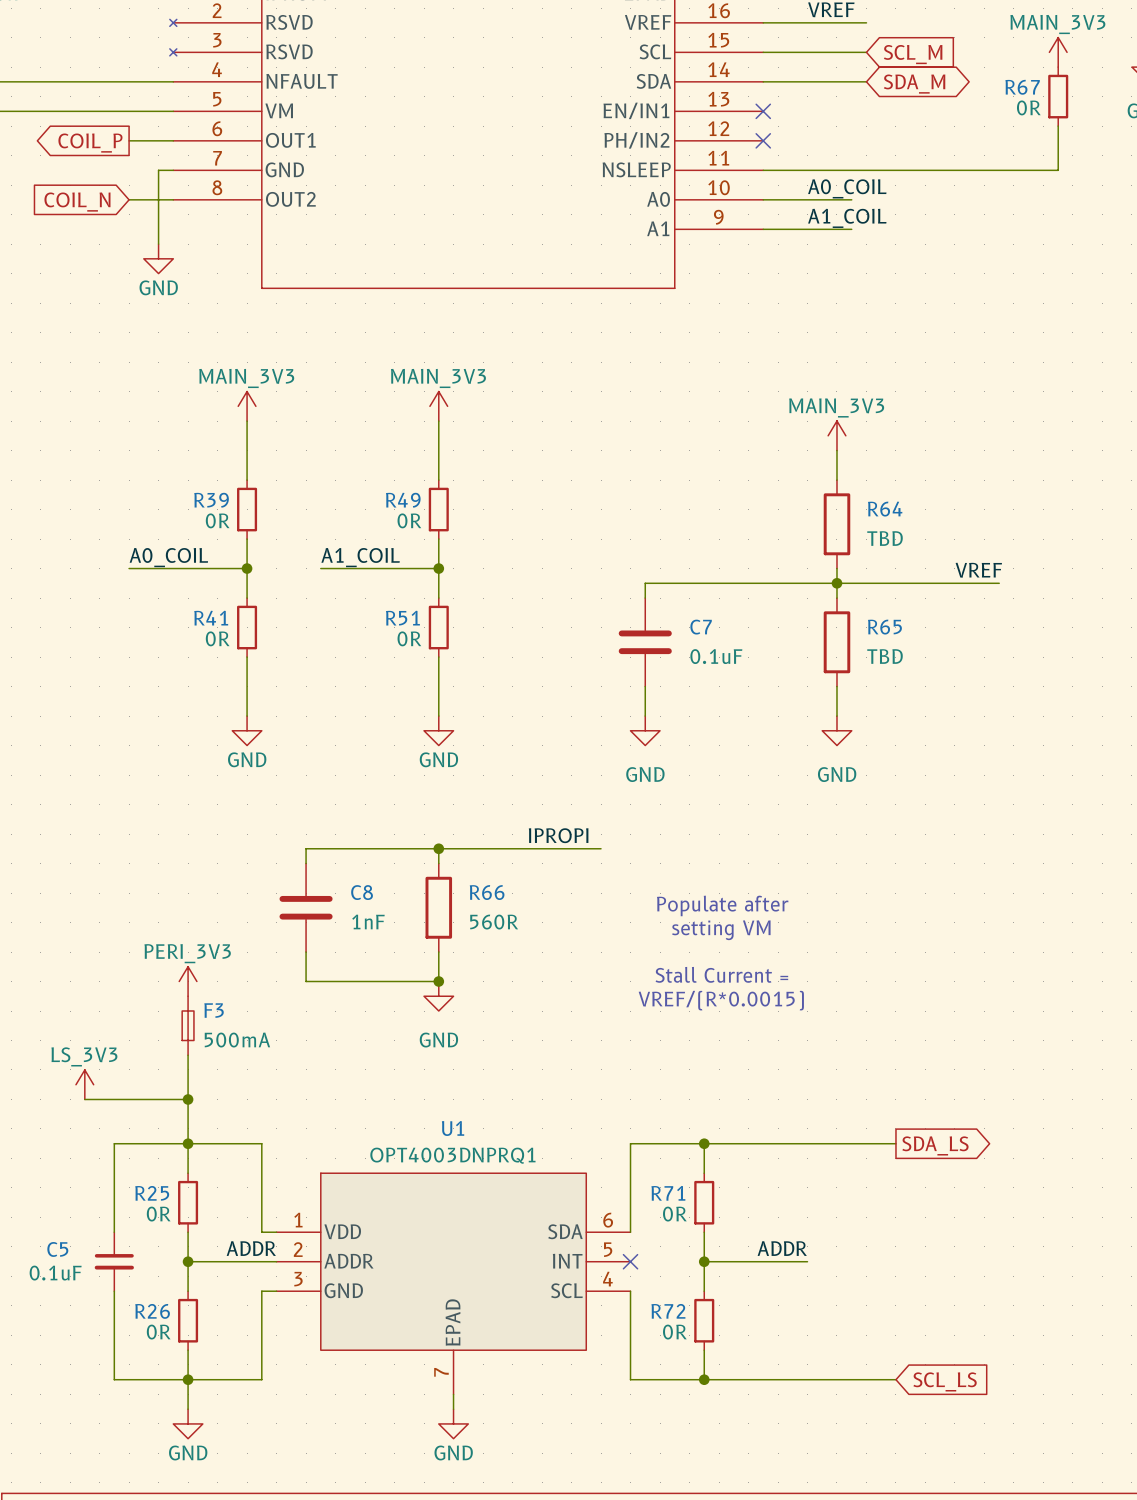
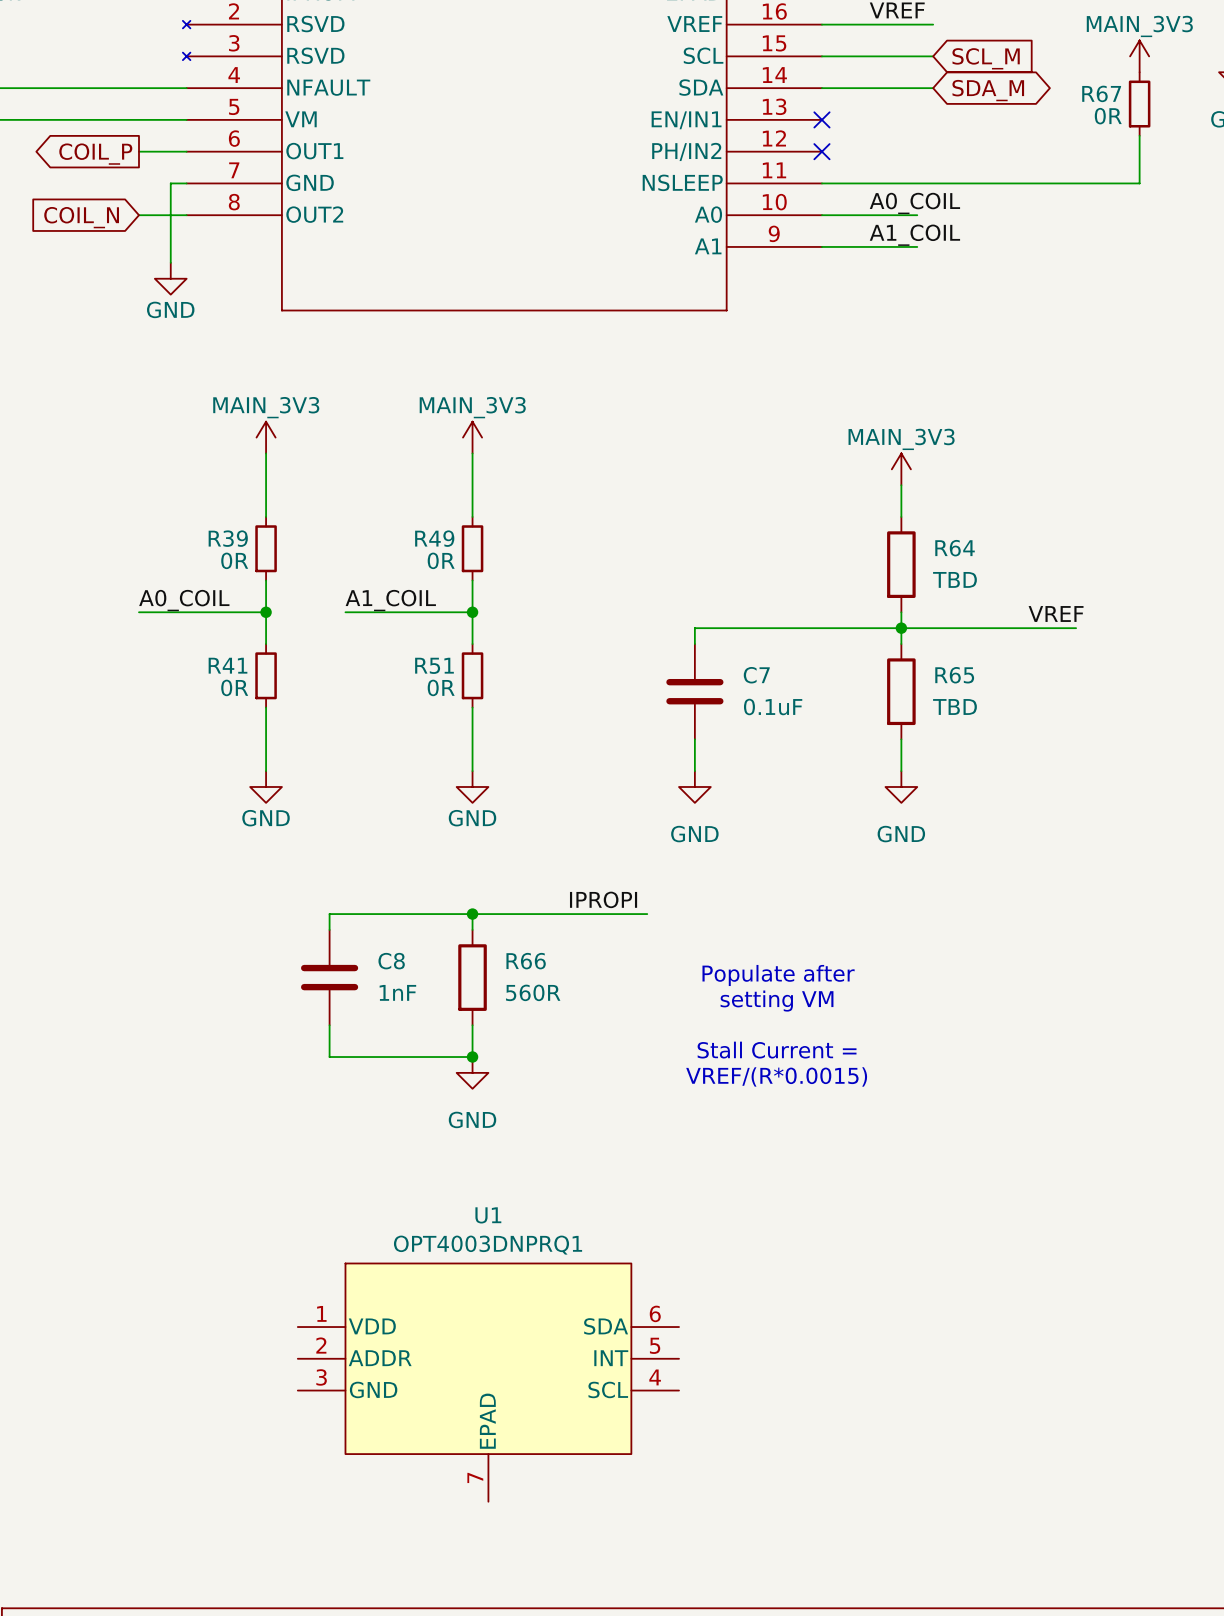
power symbol: PERI_3V3 (188, 981) -> none
F3: 500mA (188, 1025) -> none
wire: (188, 1055) (188, 1173) -> none
power symbol: LS_3V3 (84, 1084) -> none
wire: (84, 1099) (188, 1099) -> none
junction: (188, 1099) -> none
junction: (188, 1143) -> none
wire: (704, 1143) (704, 1173) -> none
junction: (704, 1143) -> none
wire: (895, 1143) (630, 1143) (630, 1232) -> none
global label: SDA_LS (935, 1145) -> none
R25: 0R (188, 1202) -> none
R71: 0R (704, 1202) -> none
wire: (114, 1232) (114, 1143) (261, 1143) (261, 1232) (276, 1232) -> none
wire: (188, 1232) (188, 1291) -> none
wire: (704, 1232) (704, 1291) -> none
label: ADDR (251, 1248) -> none
label: ADDR (782, 1248) -> none
C5: 0.1uF (114, 1261) -> none
wire: (188, 1261) (276, 1261) -> none
junction: (188, 1261) -> none
no-connect mark: (630, 1261) -> none
wire: (704, 1261) (807, 1261) -> none
junction: (704, 1261) -> none
wire: (114, 1291) (114, 1379) (261, 1379) (261, 1291) (276, 1291) -> none
wire: (630, 1291) (630, 1379) (895, 1379) -> none
R26: 0R (188, 1320) -> none
R72: 0R (704, 1320) -> none
wire: (188, 1350) (188, 1409) -> none
wire: (704, 1350) (704, 1379) -> none
junction: (188, 1379) -> none
junction: (704, 1379) -> none
global label: SCL_LS (945, 1381) -> none
wire: (453, 1394) (453, 1409) -> none
power symbol: GND (188, 1423) -> none
power symbol: GND (453, 1423) -> none

